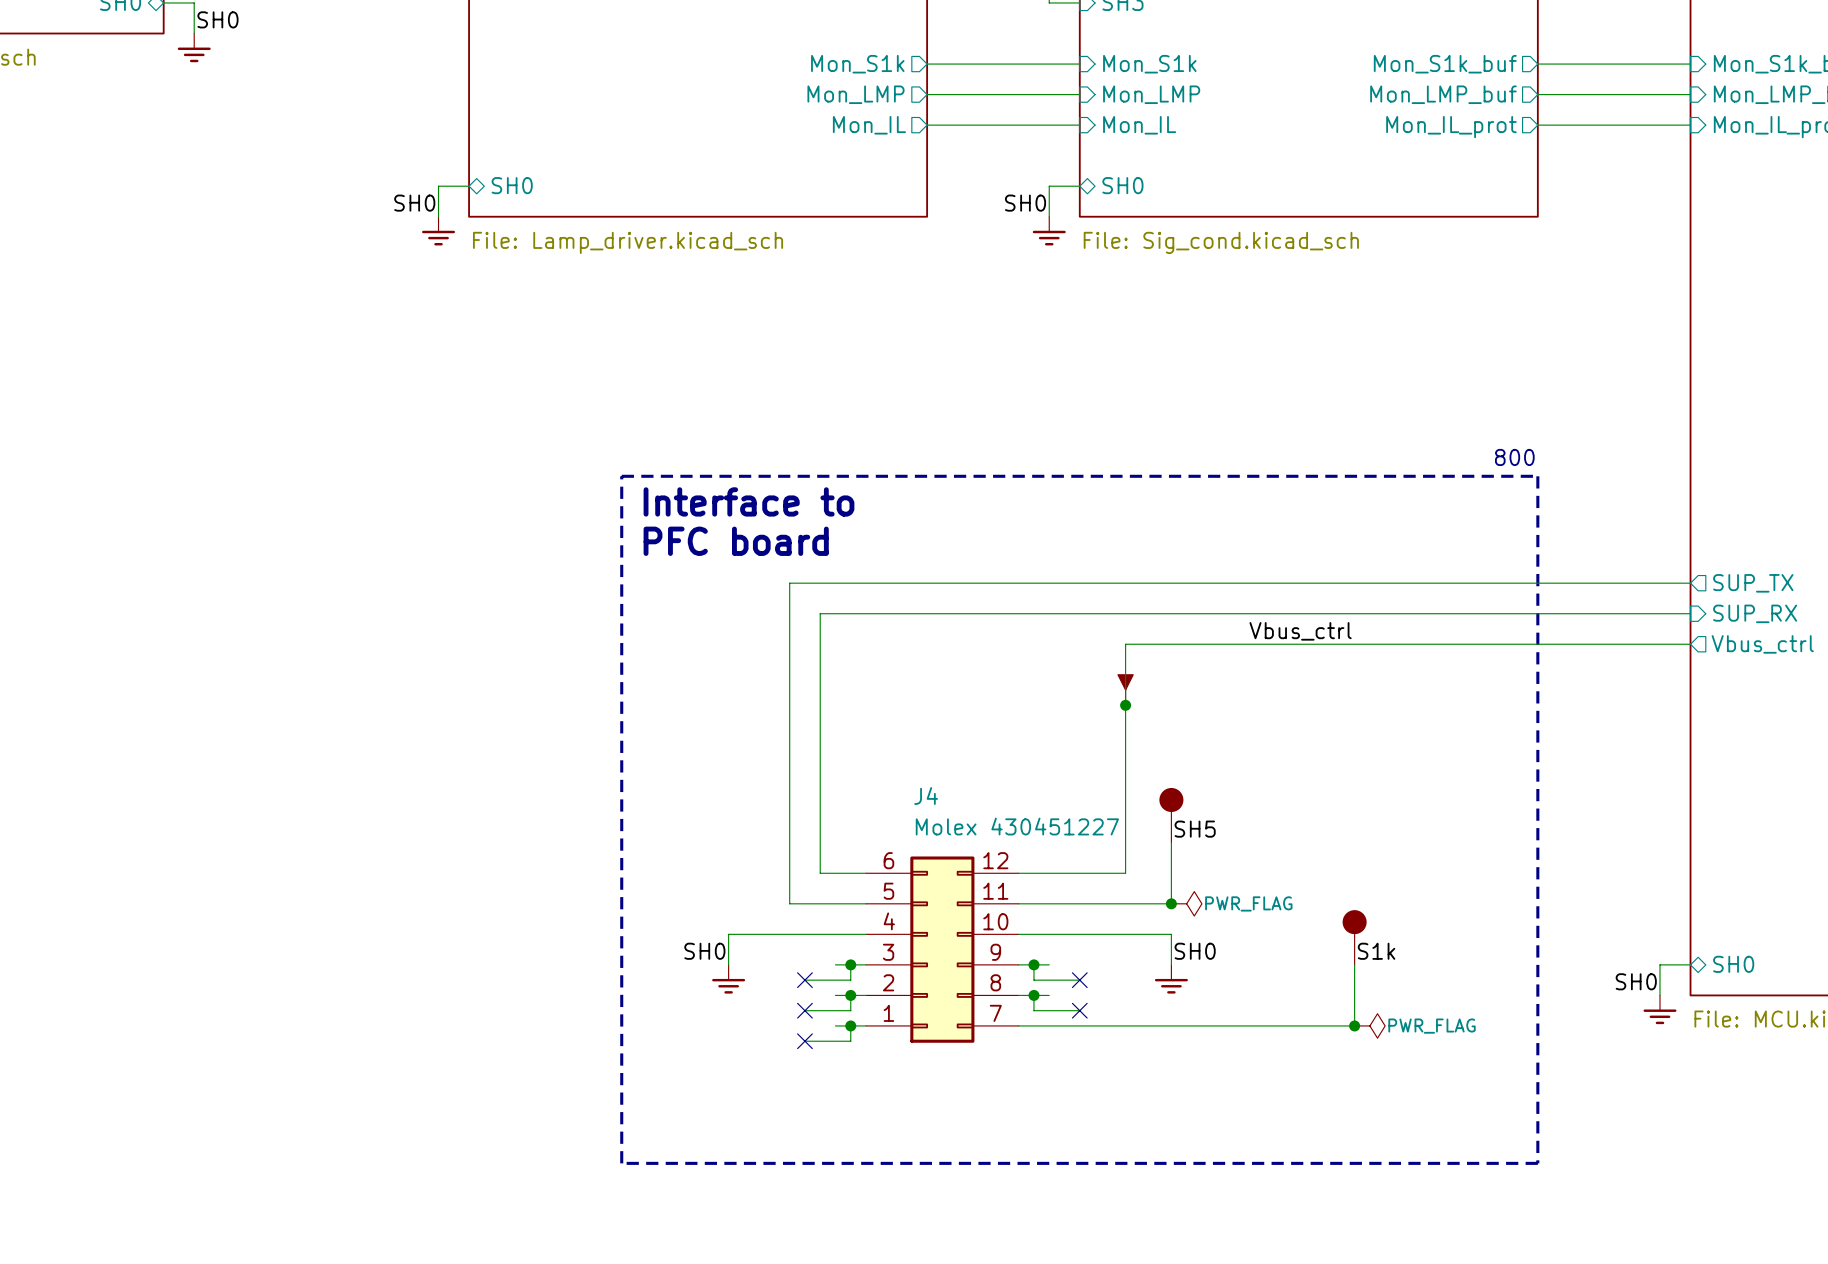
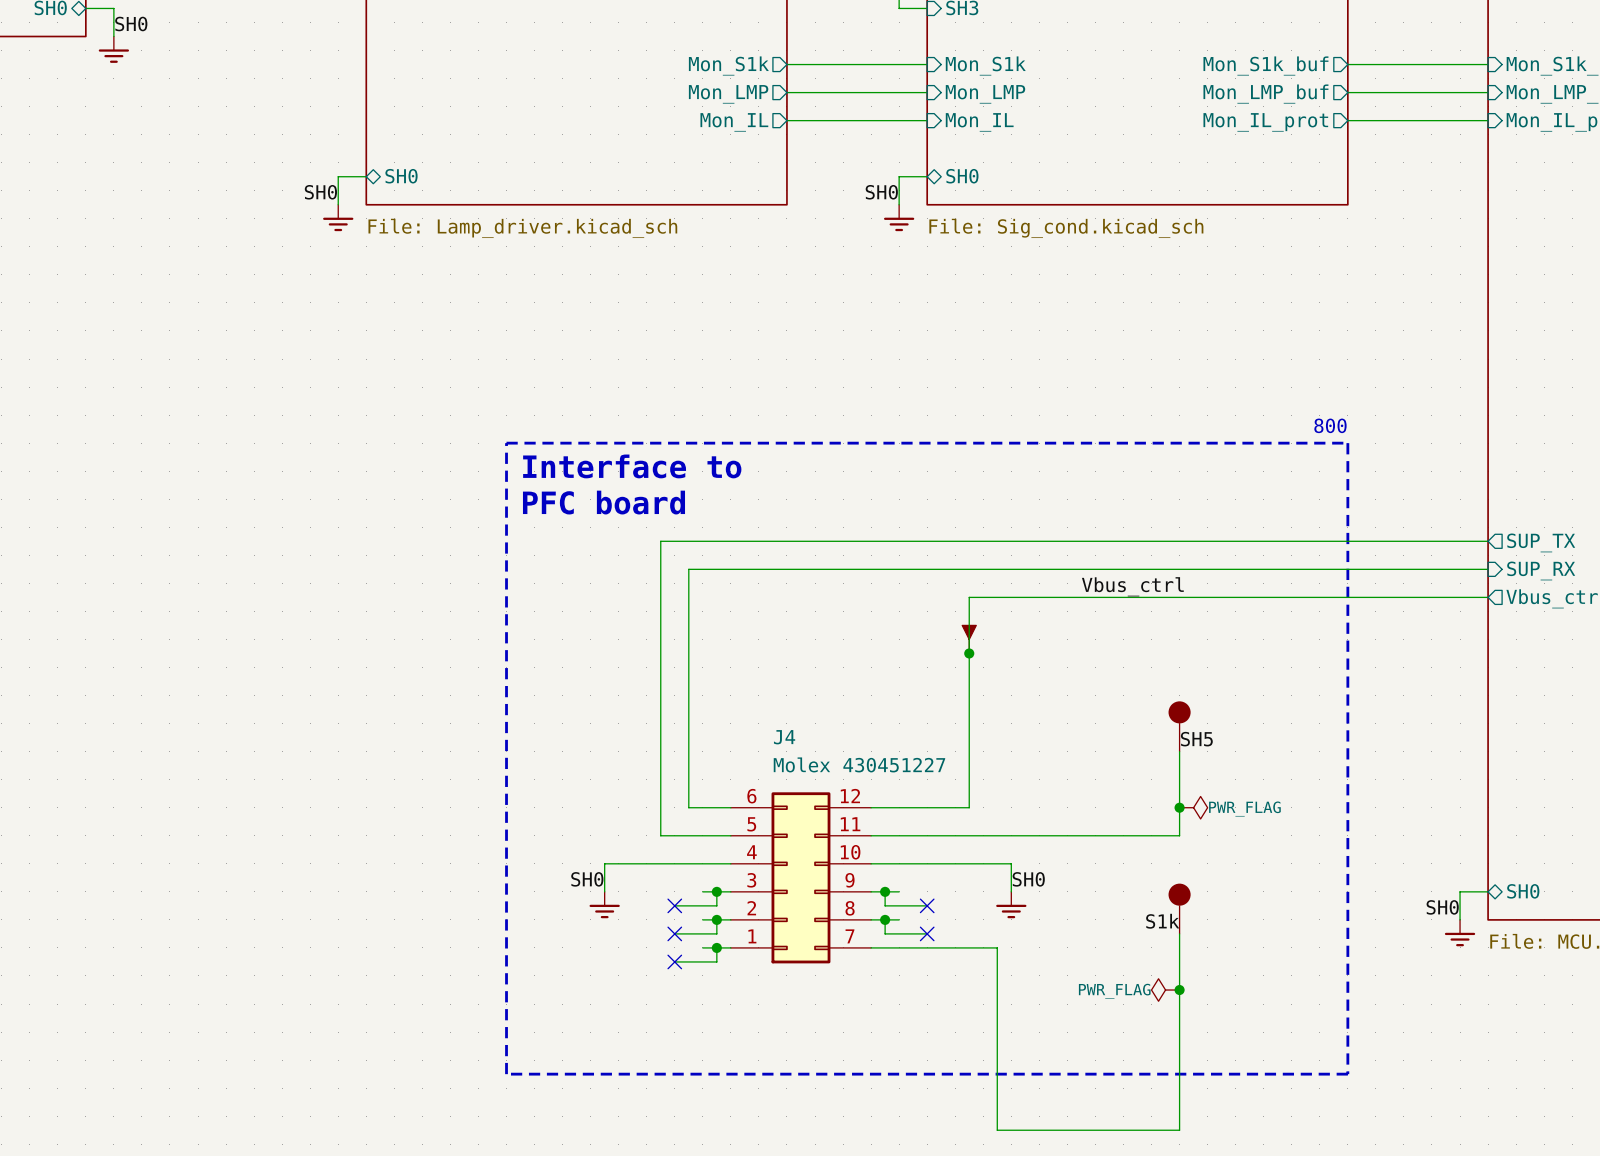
part: none -> (1179, 726)
part: (1171, 815) -> none
label position: SH5 (1195, 829) -> SH5 (1196, 739)
wire: (1171, 842) (1171, 903) -> (1179, 751) (1179, 835) (1011, 835)
junction: none -> (1179, 807)
power symbol: none -> PWR_FLAG (1193, 807)
junction: (1171, 903) -> none
power symbol: PWR_FLAG (1186, 903) -> none
part position: (1354, 937) -> (1179, 908)
label position: S1k (1376, 951) -> S1k (1162, 921)
wire: (1156, 1025) (1354, 1025) -> (997, 947) (997, 1130) (1179, 1130) (1179, 947)
junction position: (1354, 1025) -> (1179, 990)
power symbol rotation: 0° (1369, 1025) -> 180° (1165, 990)
power symbol position: PWR_FLAG (1369, 1025) -> PWR_FLAG (1165, 990)

